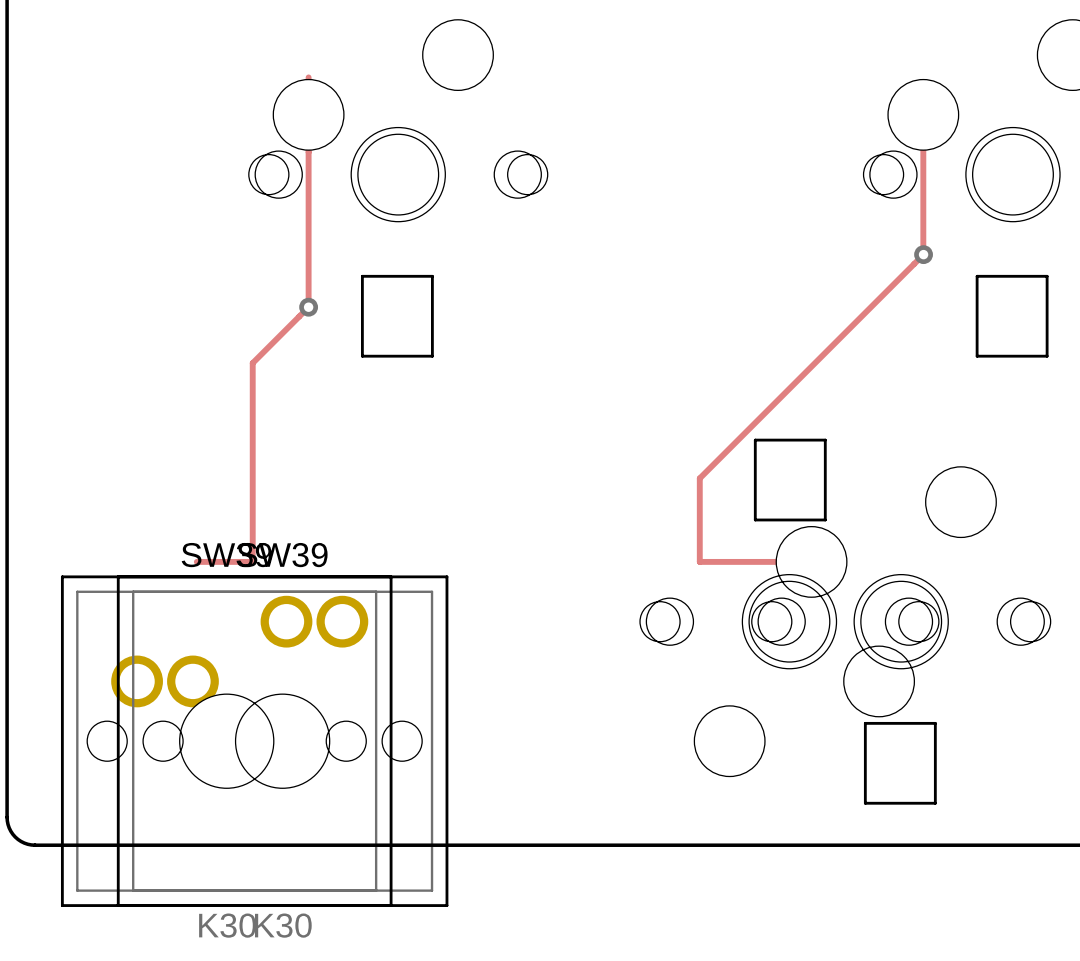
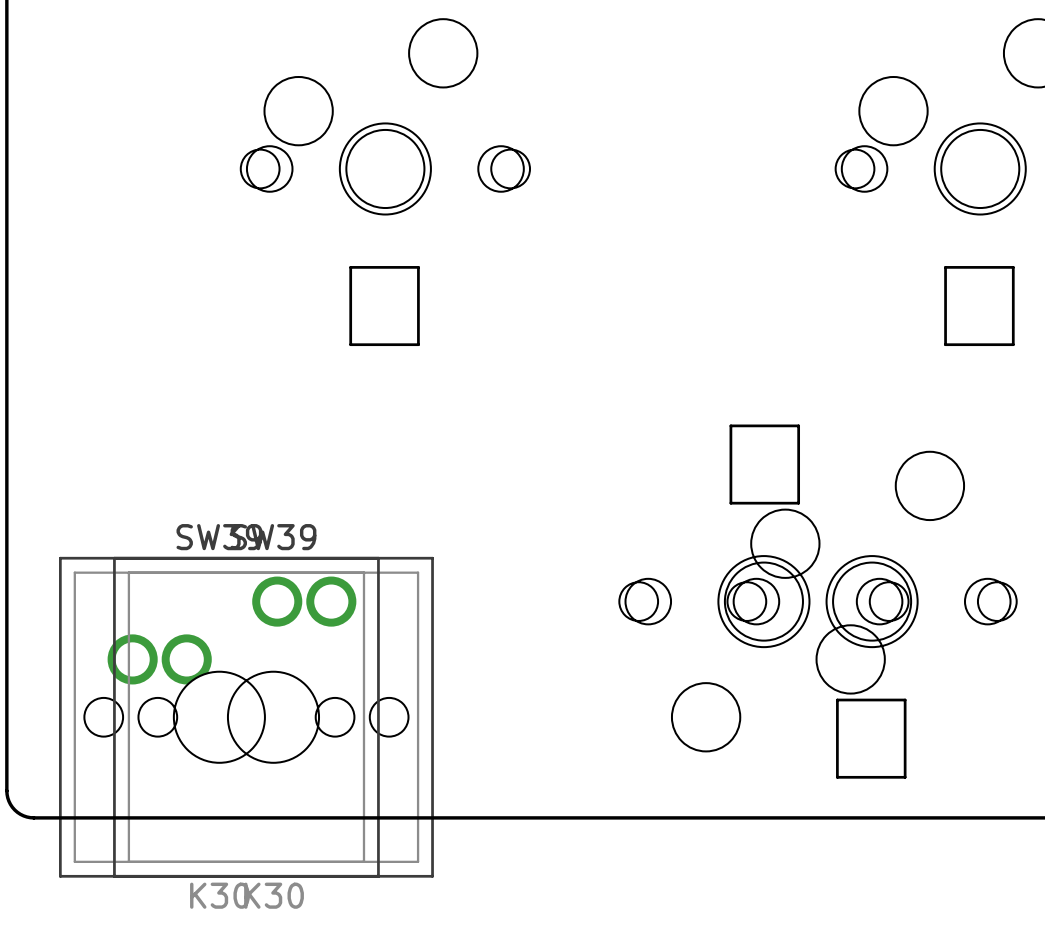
track: (308, 77) (308, 307) (252, 363) (252, 561) (196, 561) -> none
track: (923, 114) (923, 254) -> none
track: (923, 254) (699, 478) (699, 561) (811, 561) -> none
via: (923, 254) -> none
via: (308, 307) -> none

